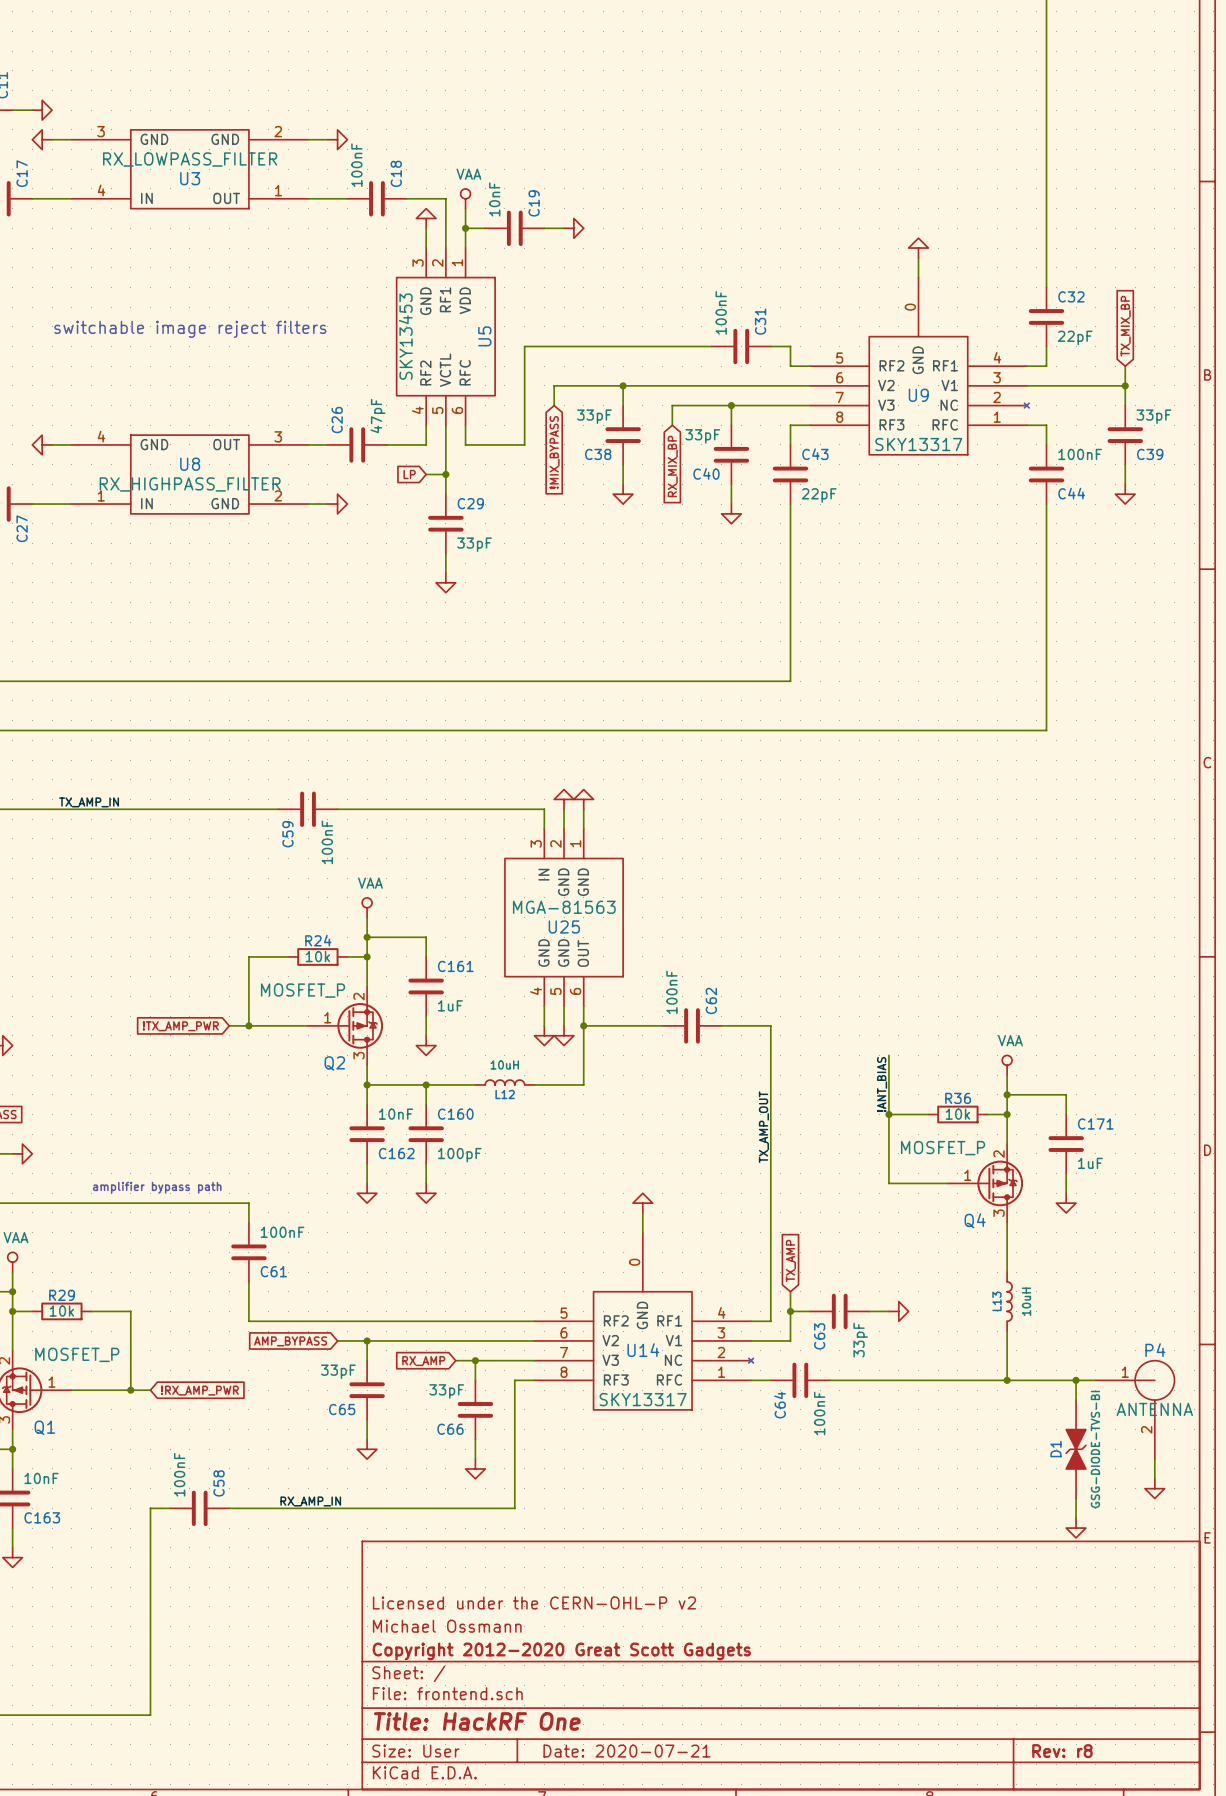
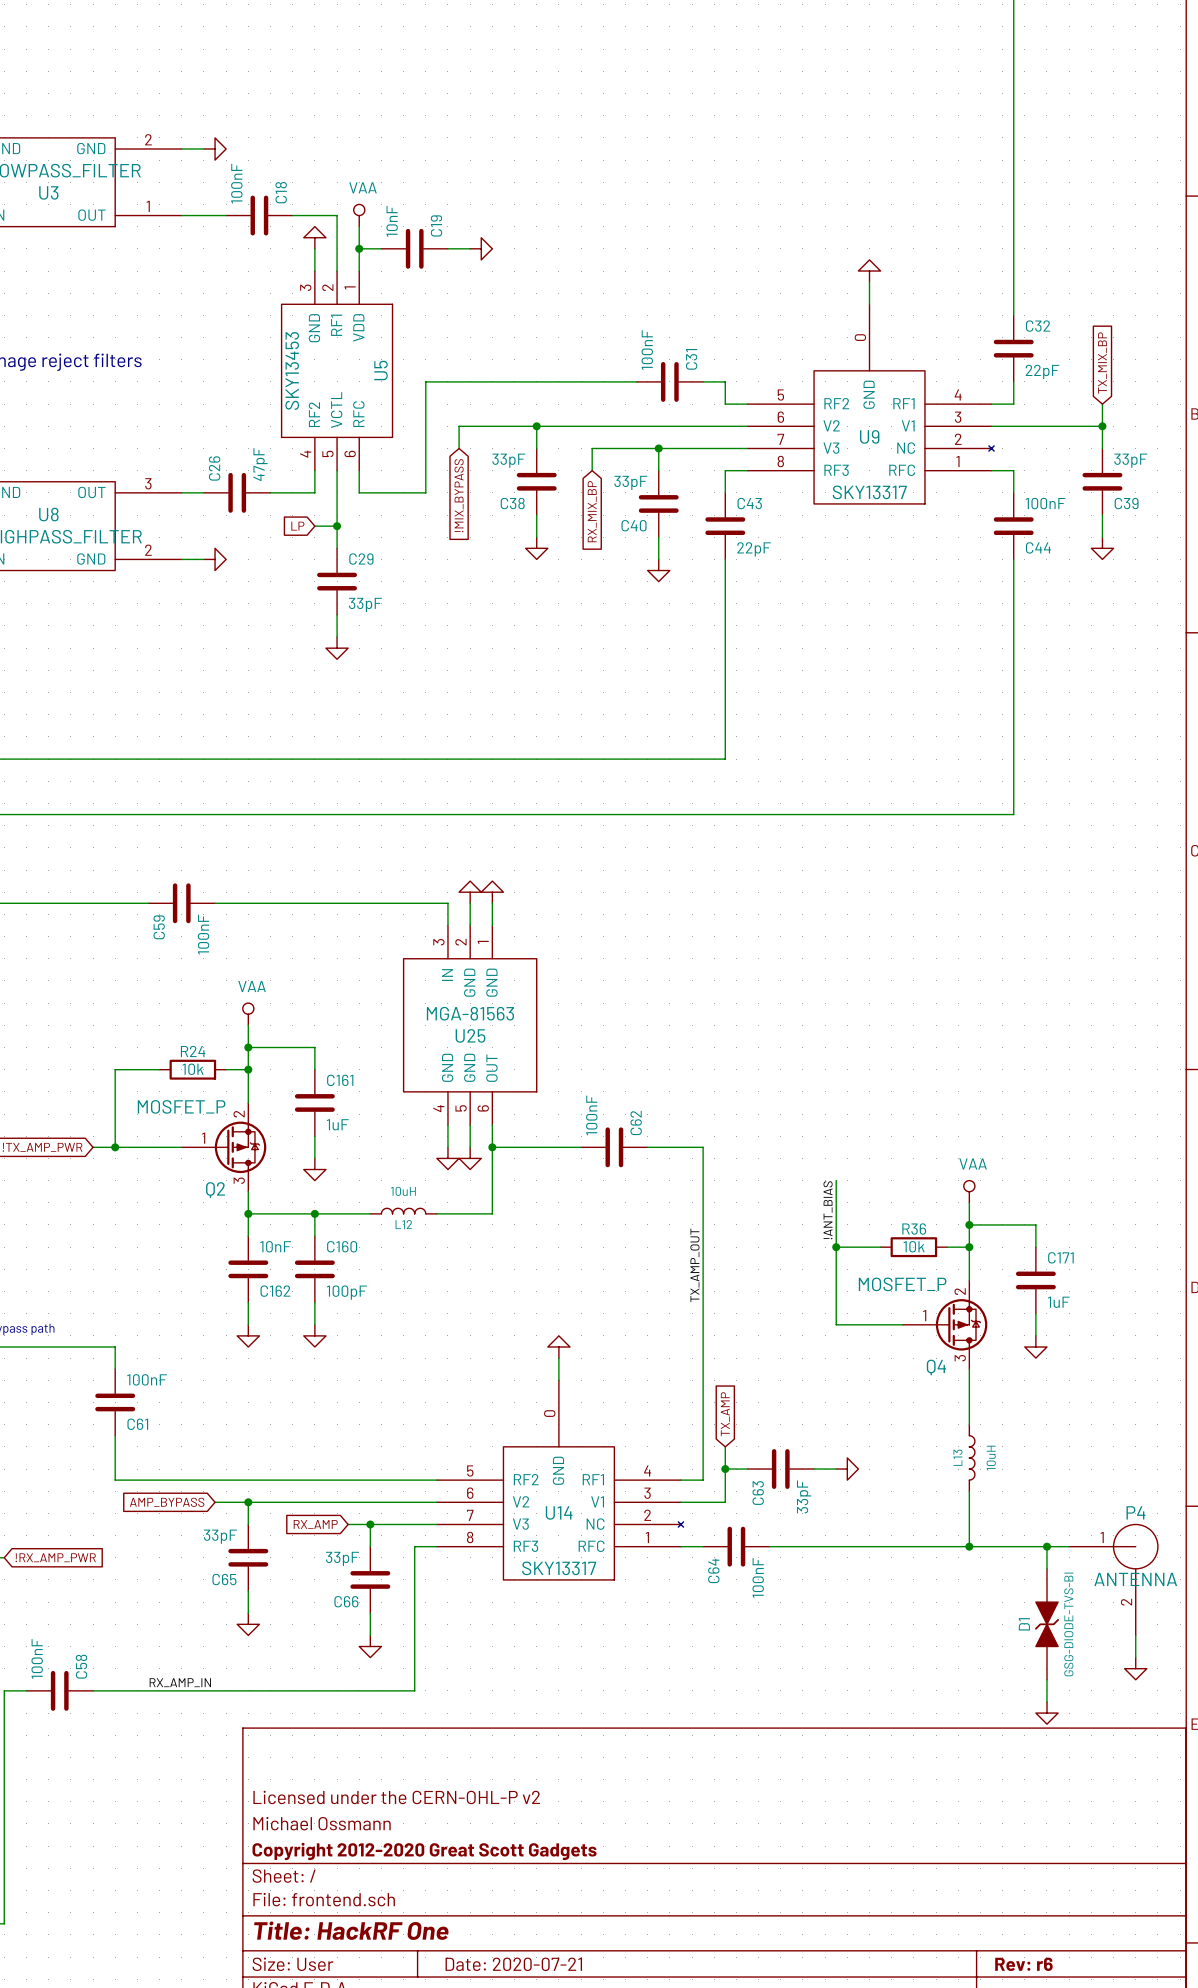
title block: Rev: r8 (1062, 1751) -> Rev: r6 (1023, 1964)

